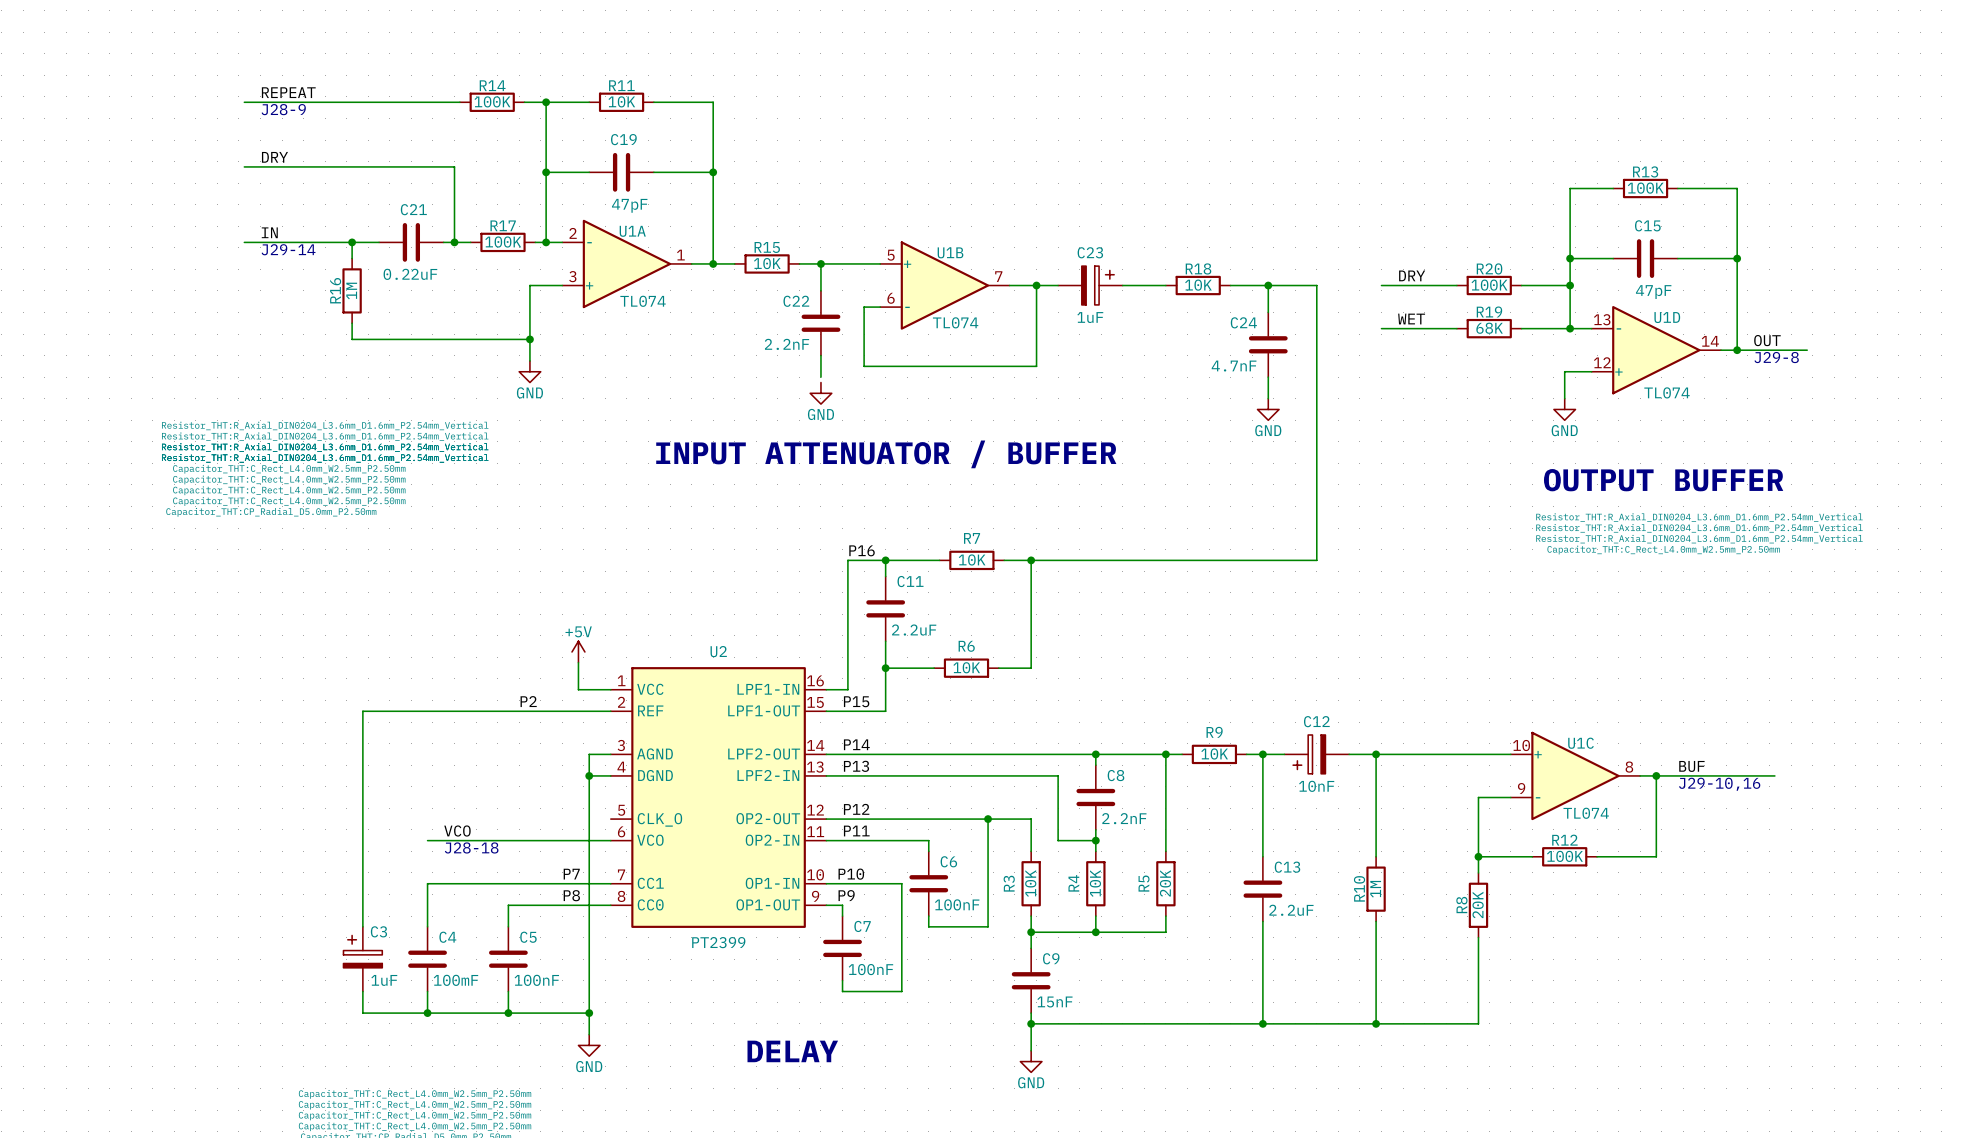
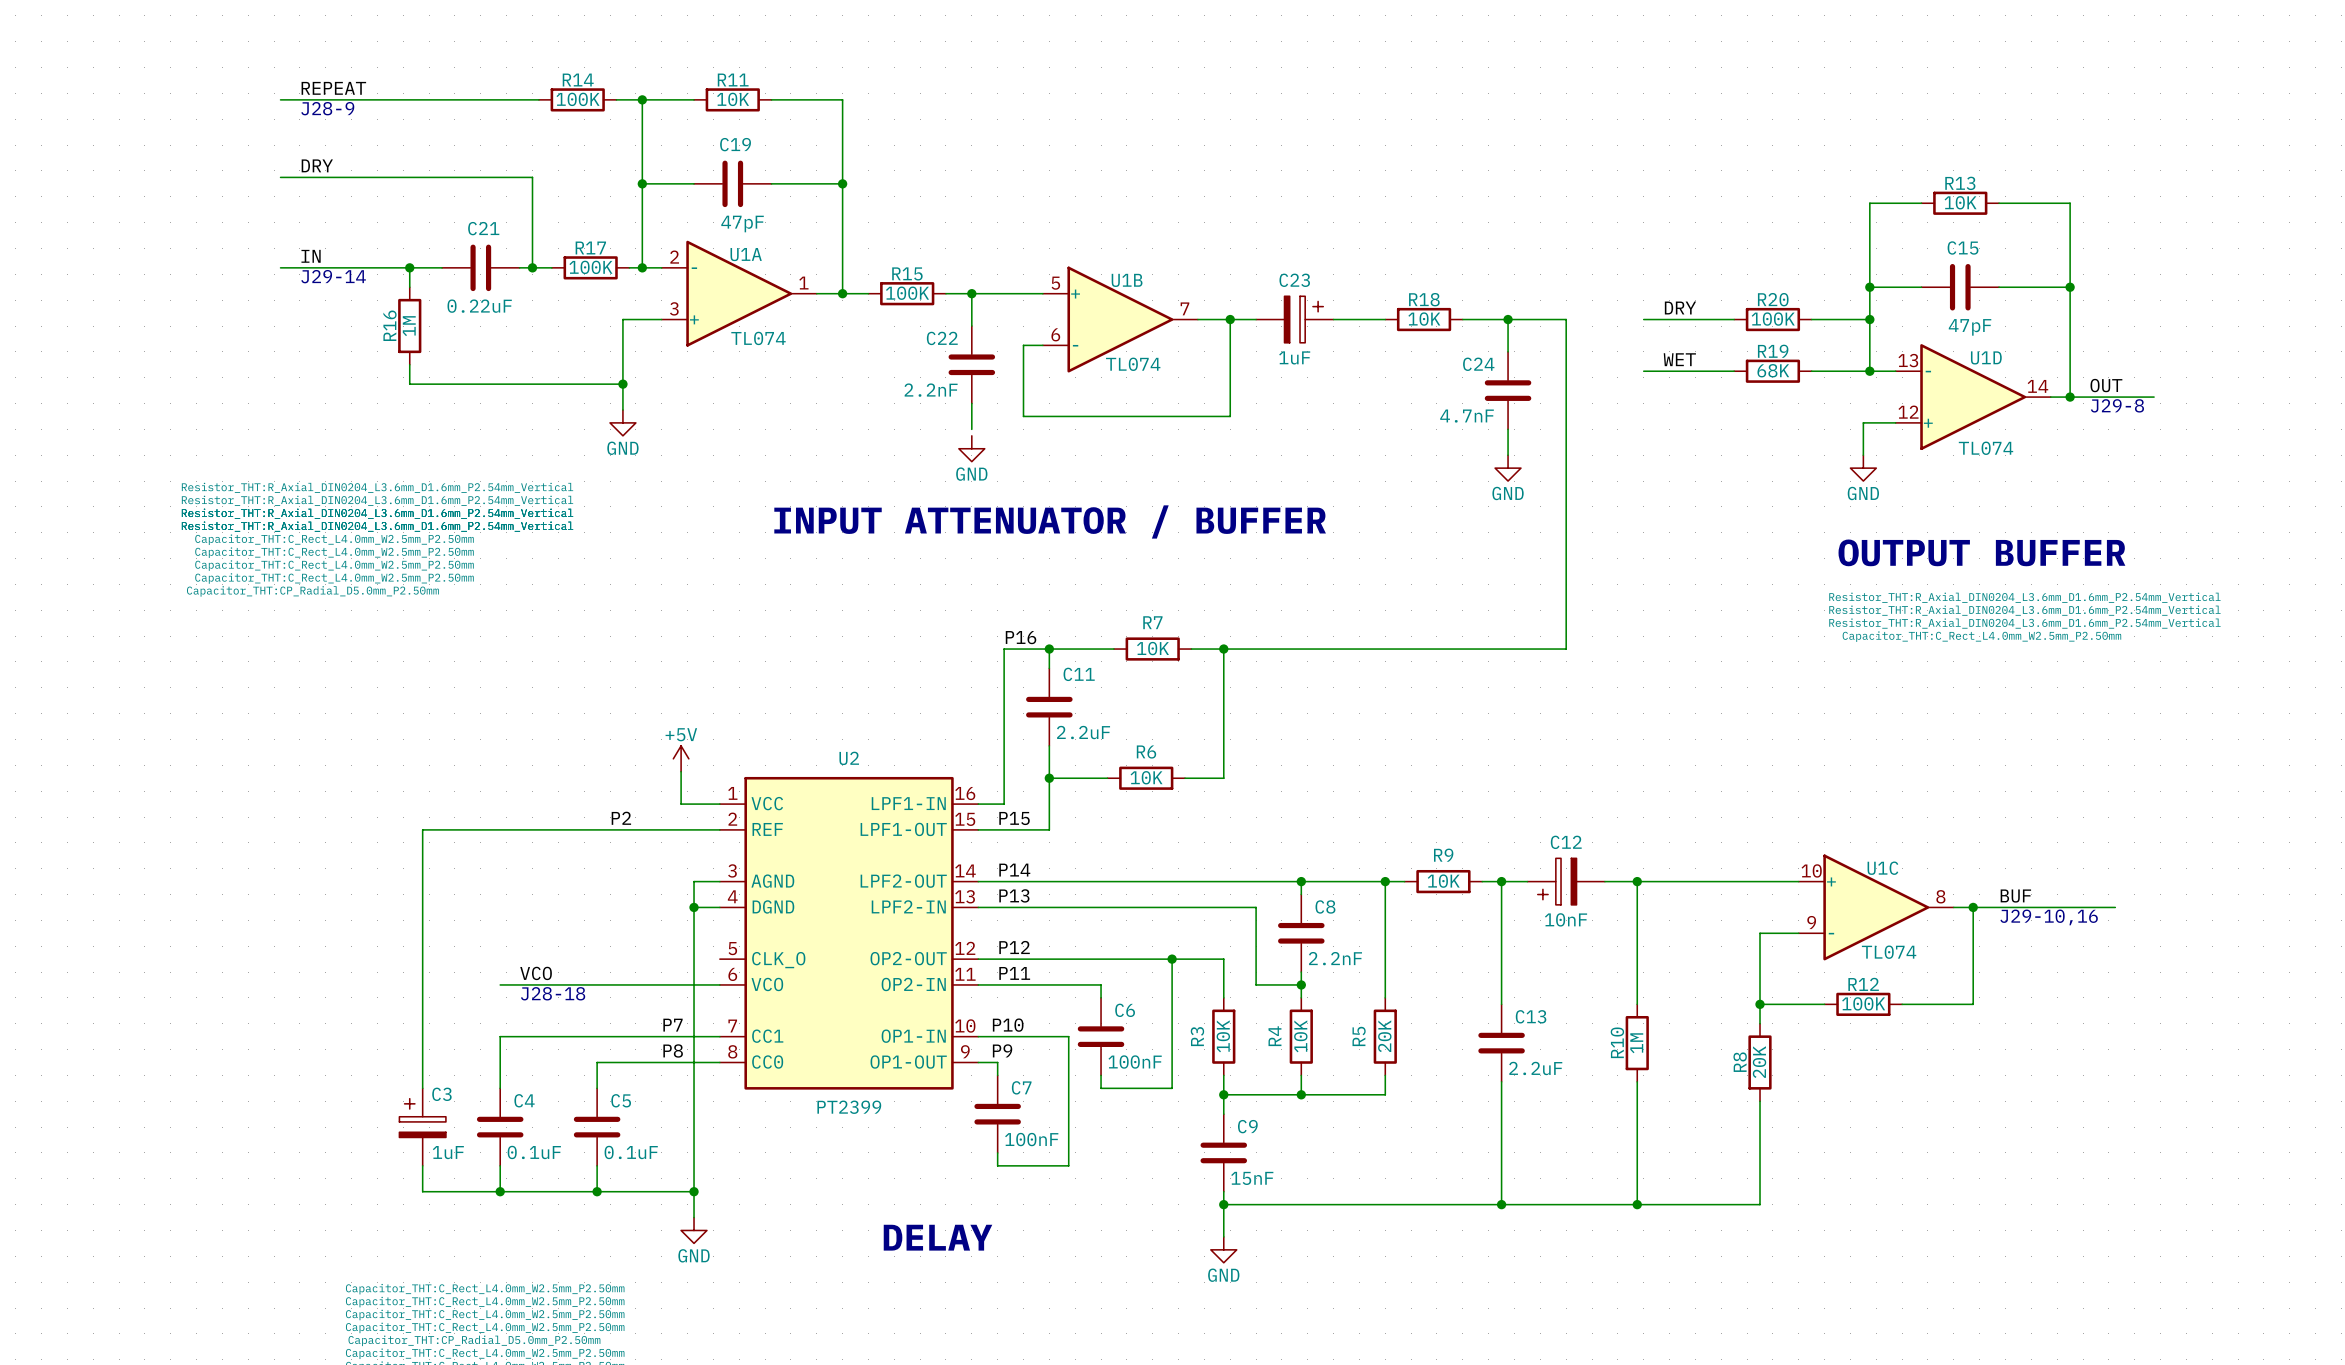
R13 value: 100K (1645, 188) -> 10K (1960, 202)
R15 value: 10K (767, 263) -> 100K (907, 293)
C4 value: 100mF (455, 980) -> 0.1uF (534, 1152)
C5 value: 100nF (536, 980) -> 0.1uF (631, 1152)

